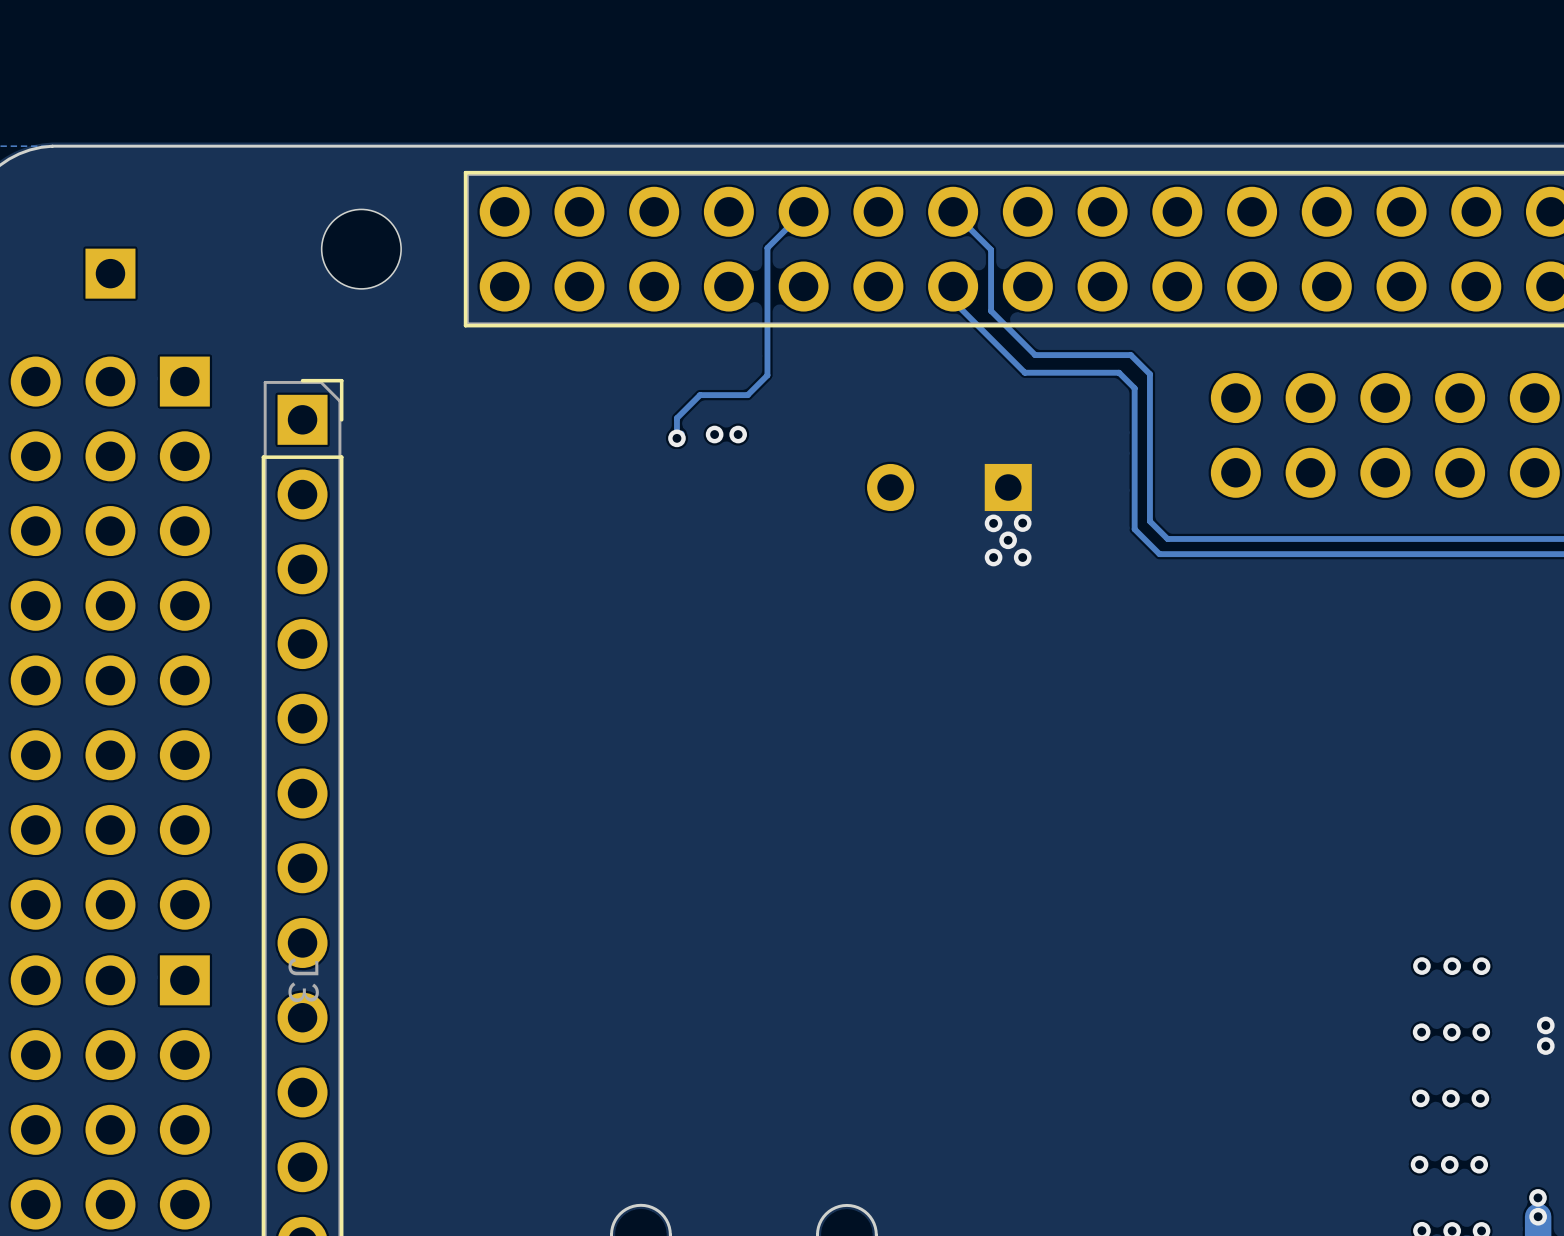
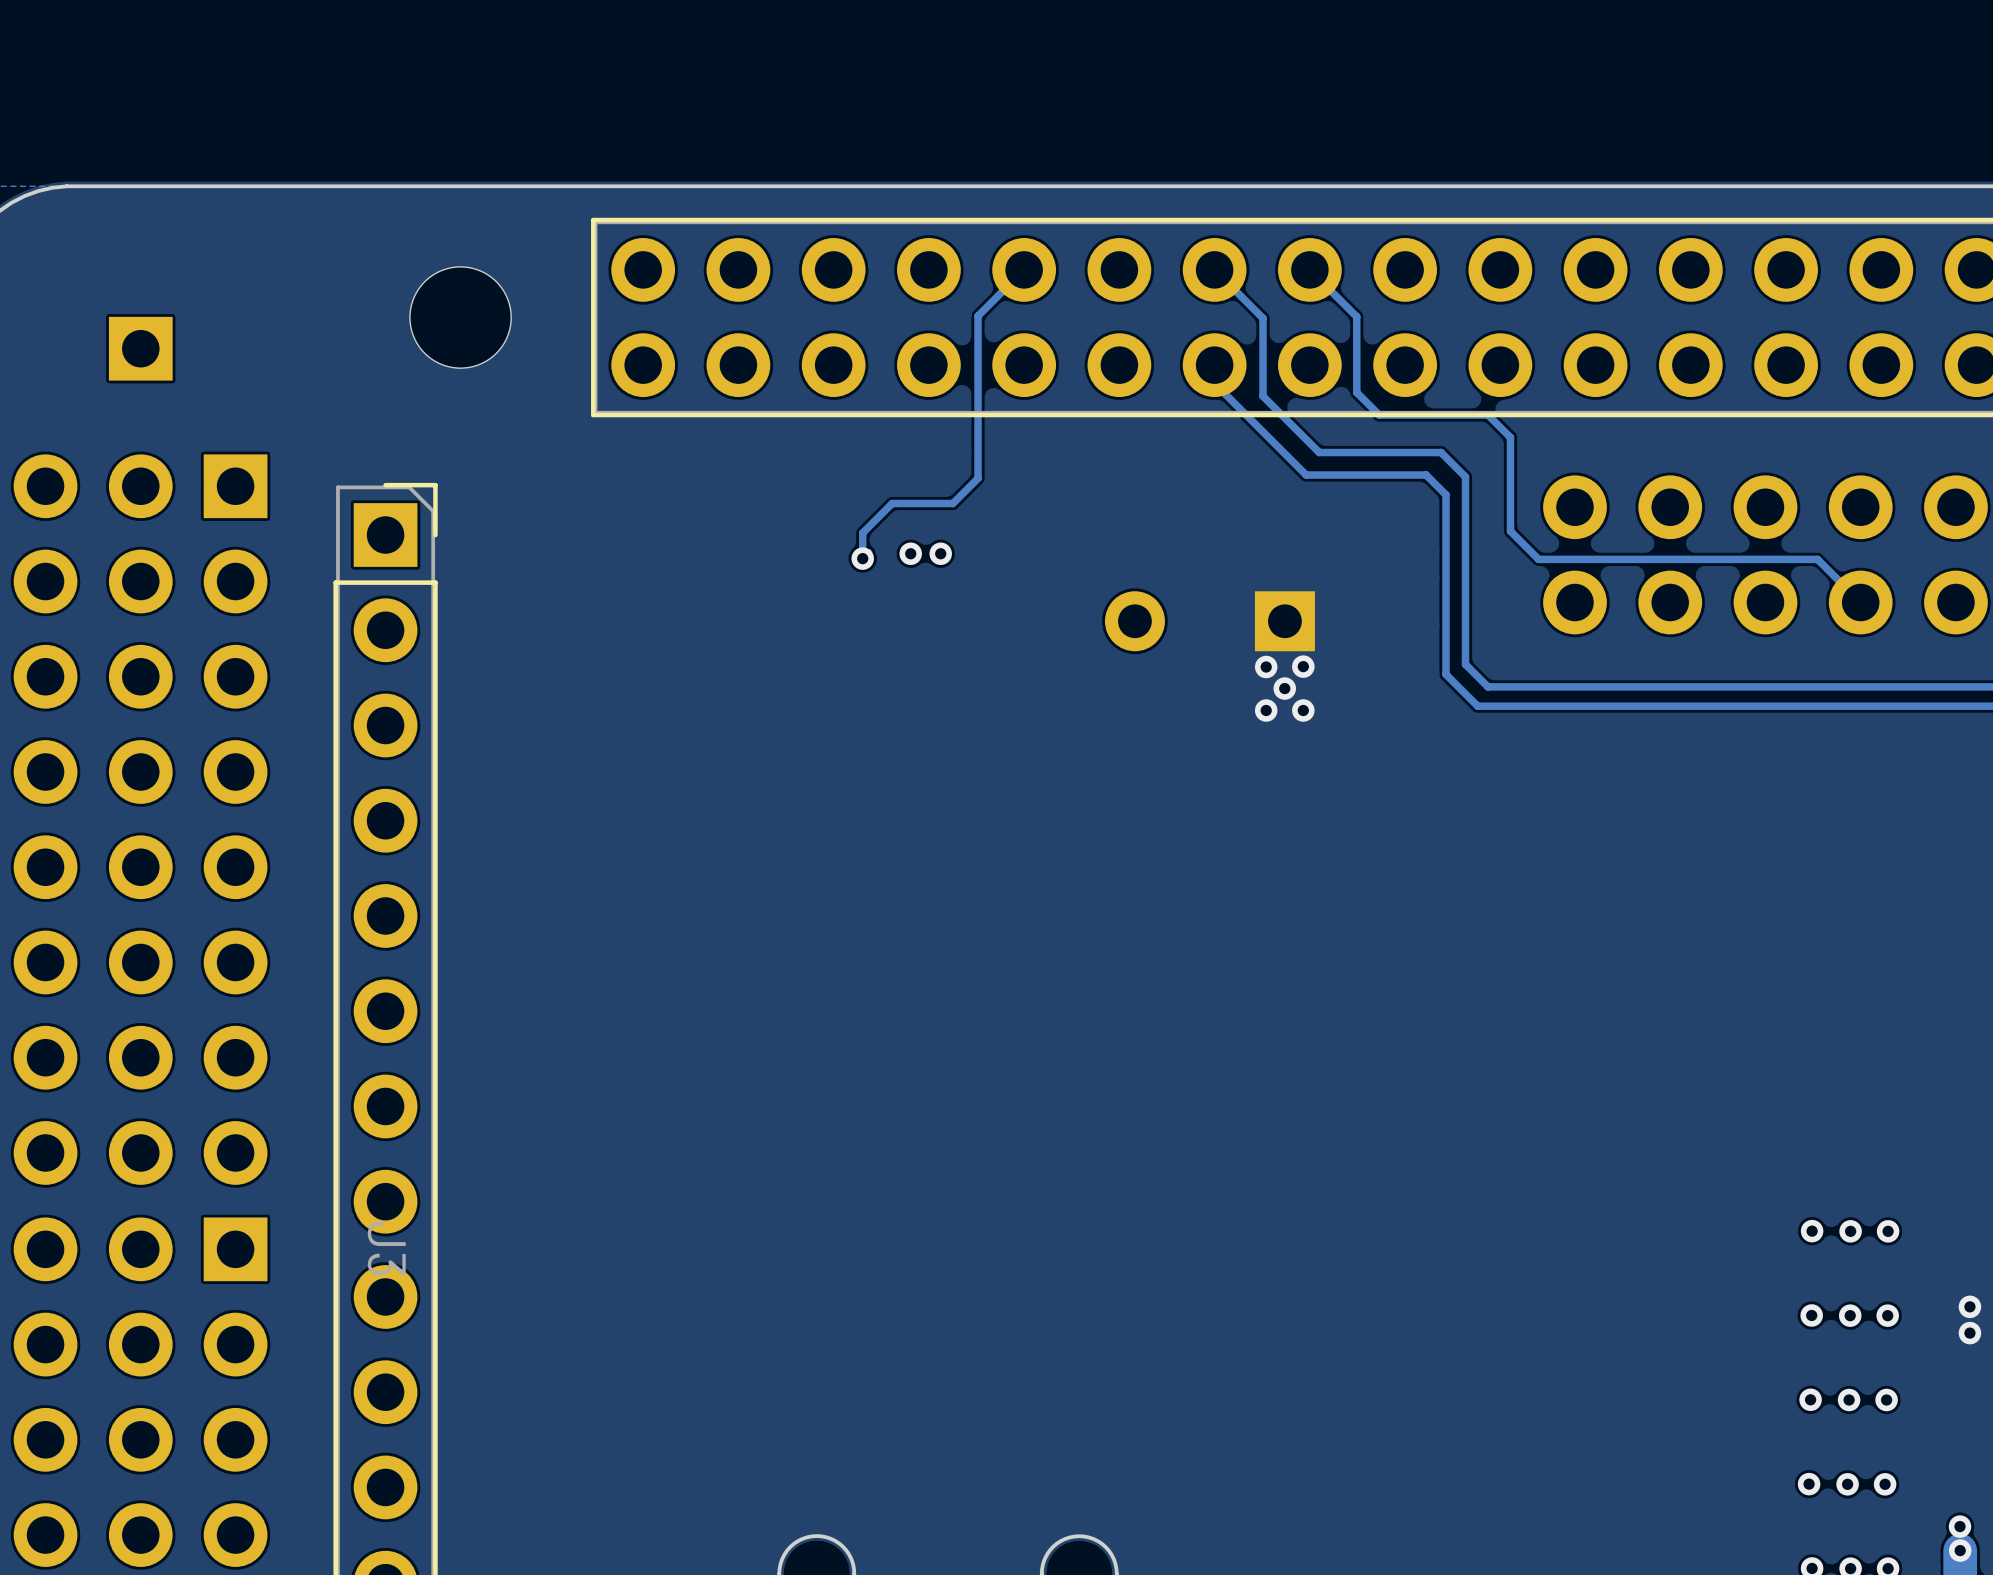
track: none -> (1309, 269) (1356, 316) (1356, 392) (1379, 415) (1487, 415) (1510, 437) (1510, 531) (1538, 559) (1817, 559) (1860, 602)

